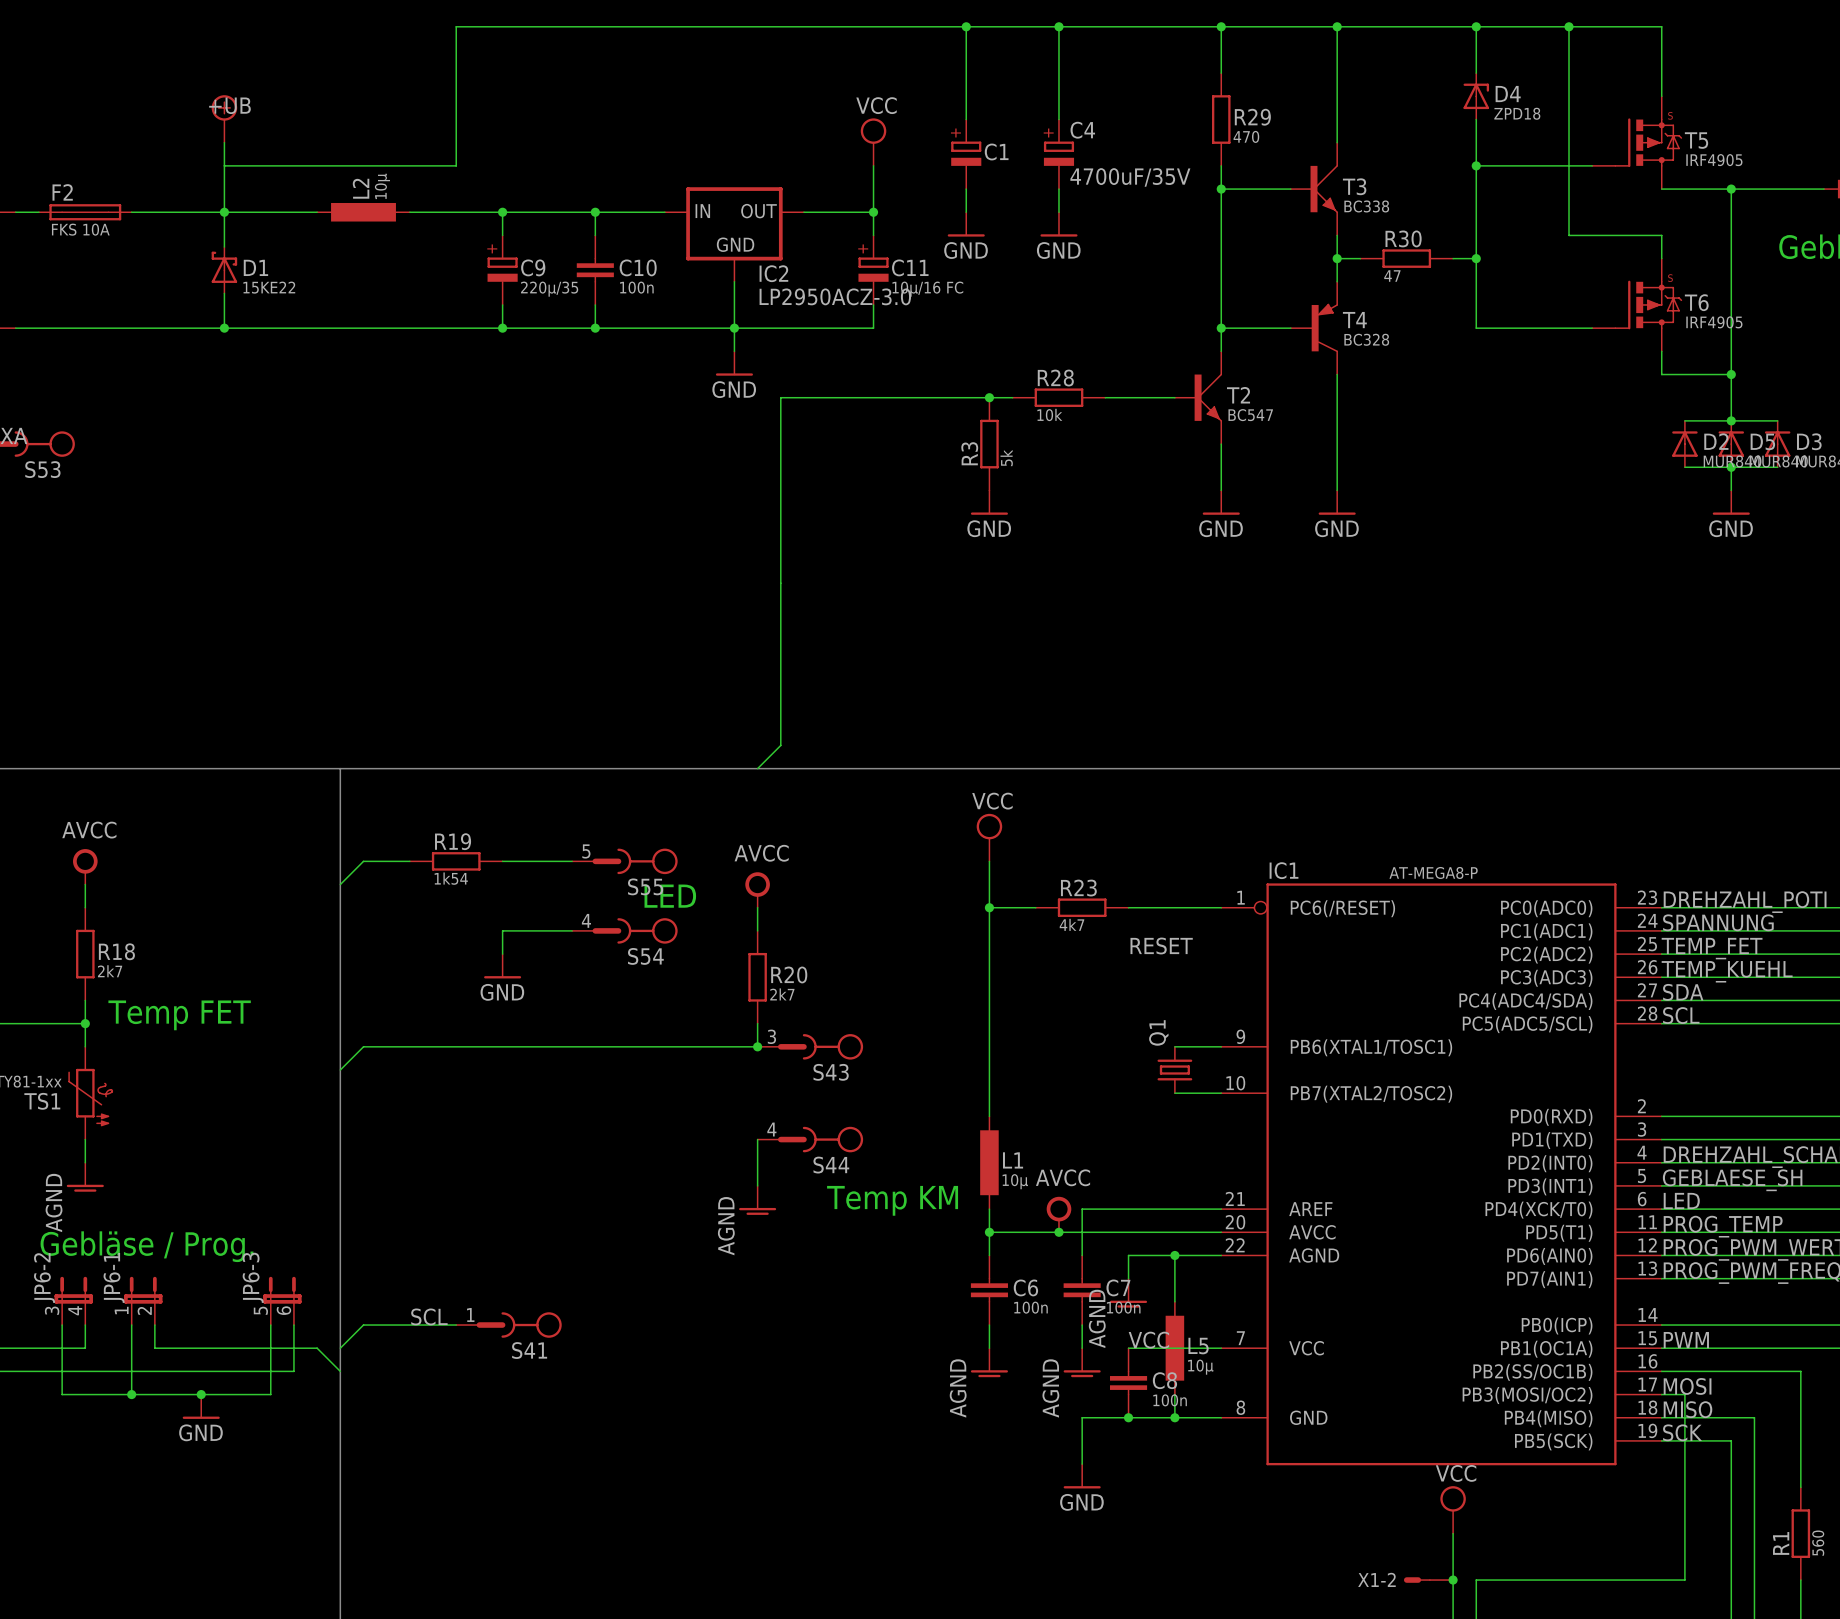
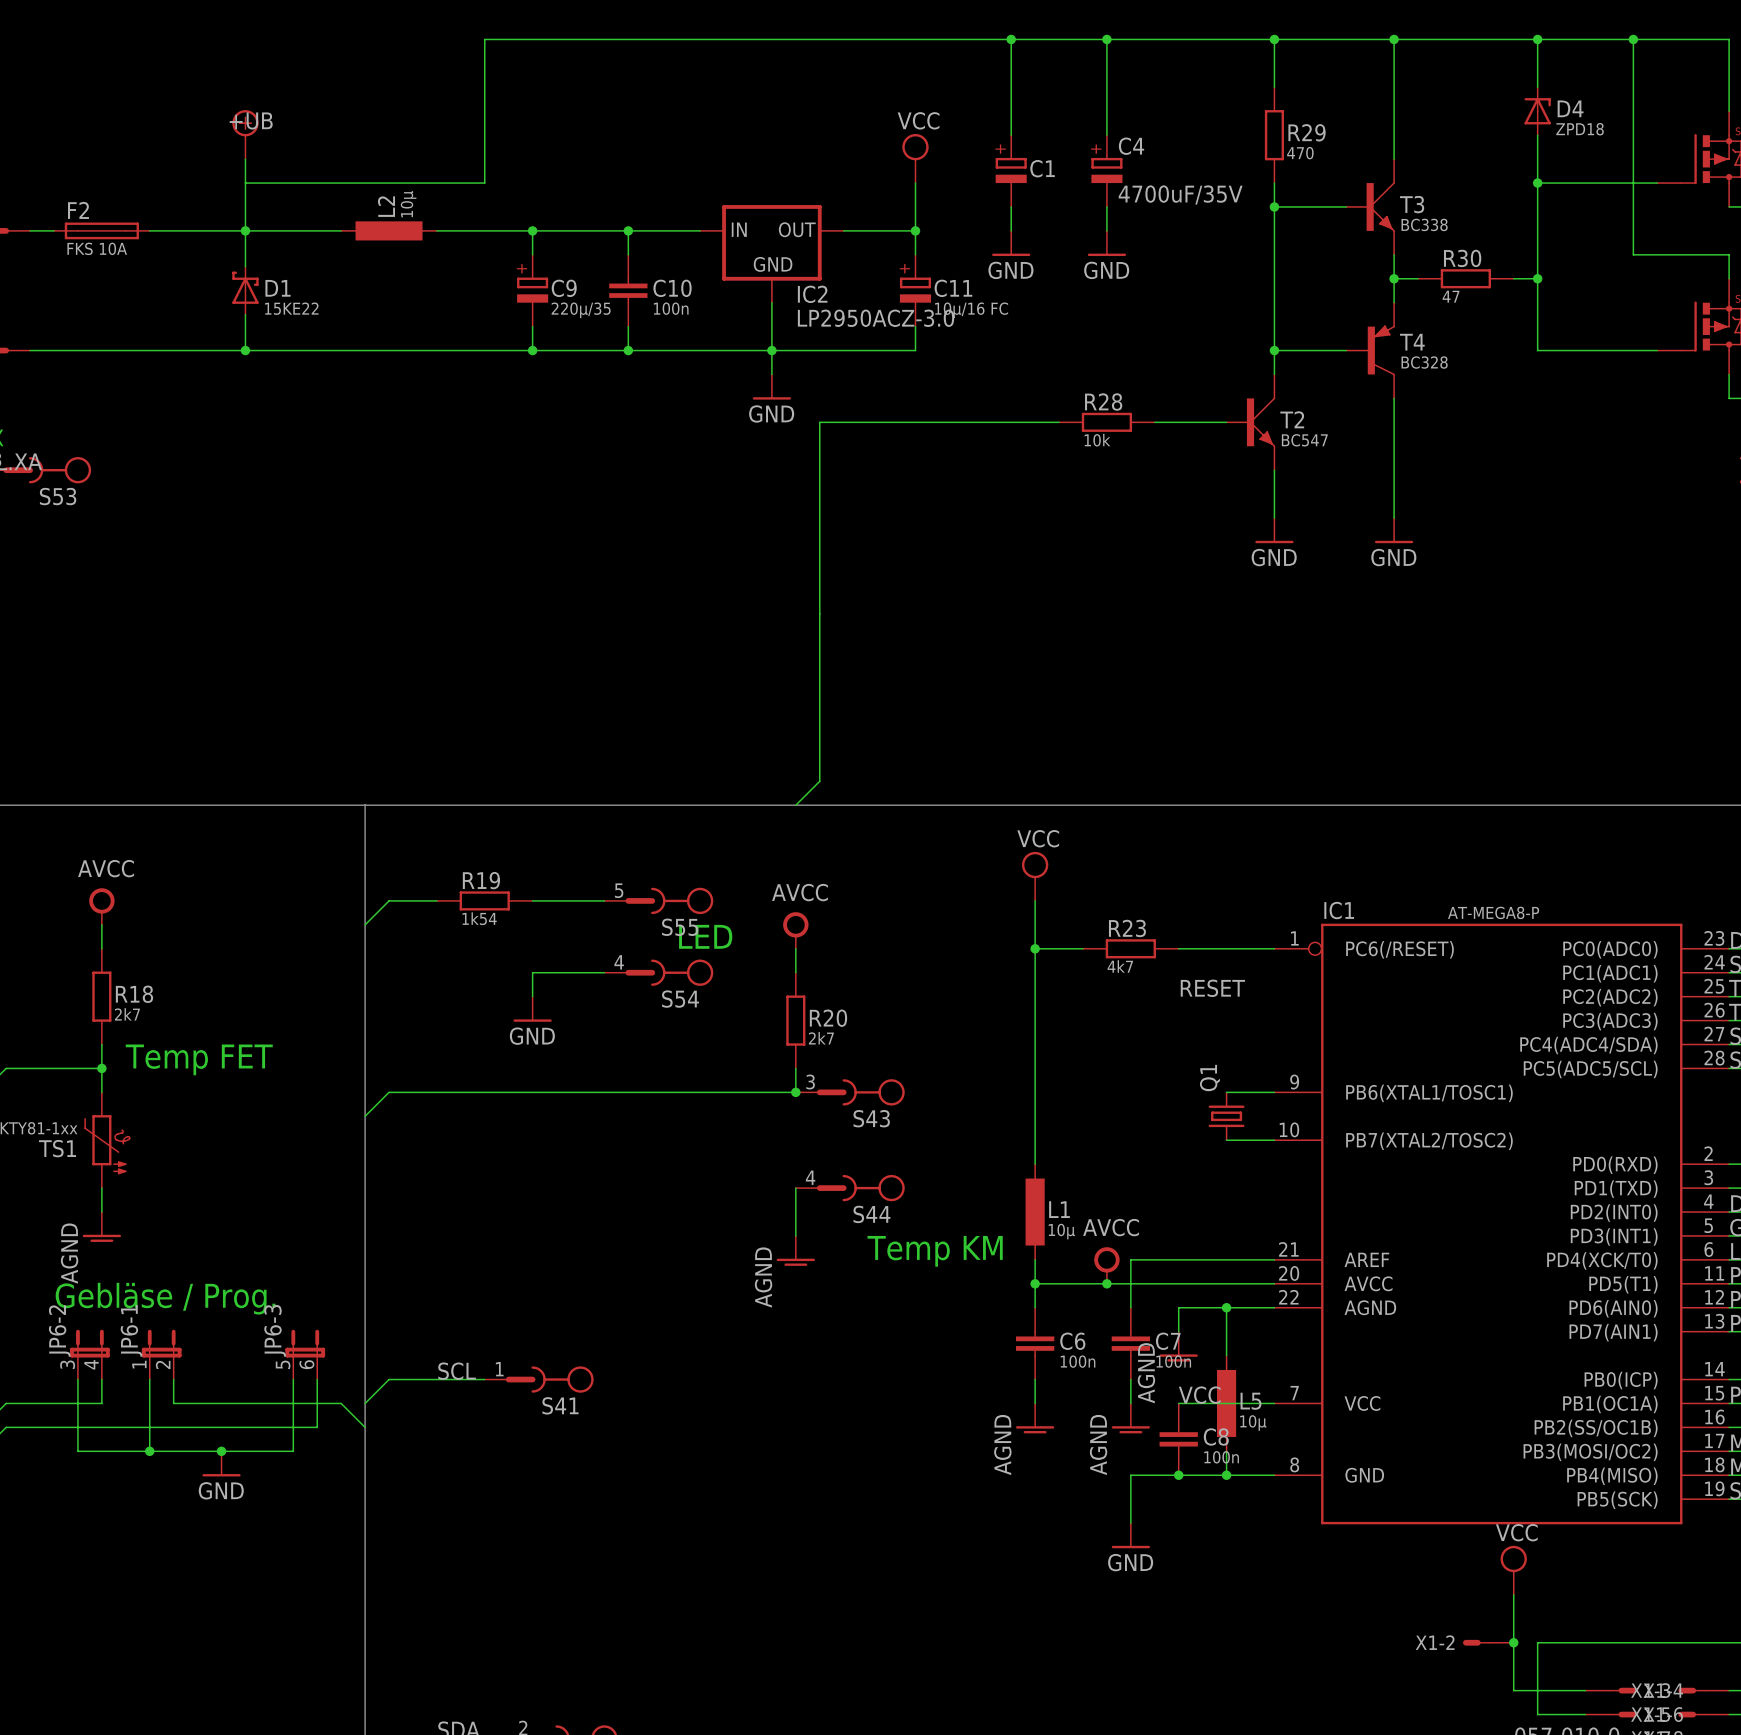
junction: (989, 397) -> none
R3: 5k (989, 444) -> none
power symbol: GND (989, 502) -> none

